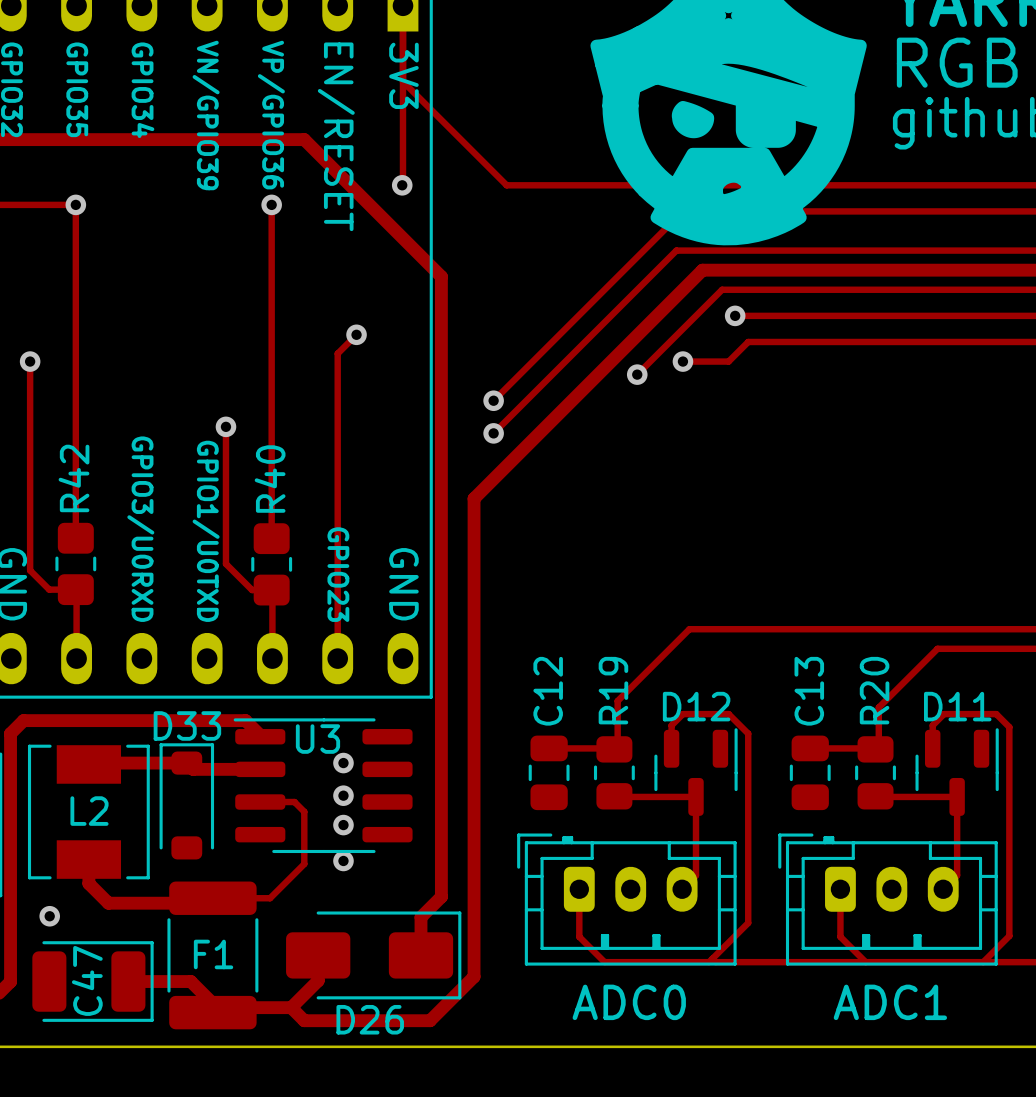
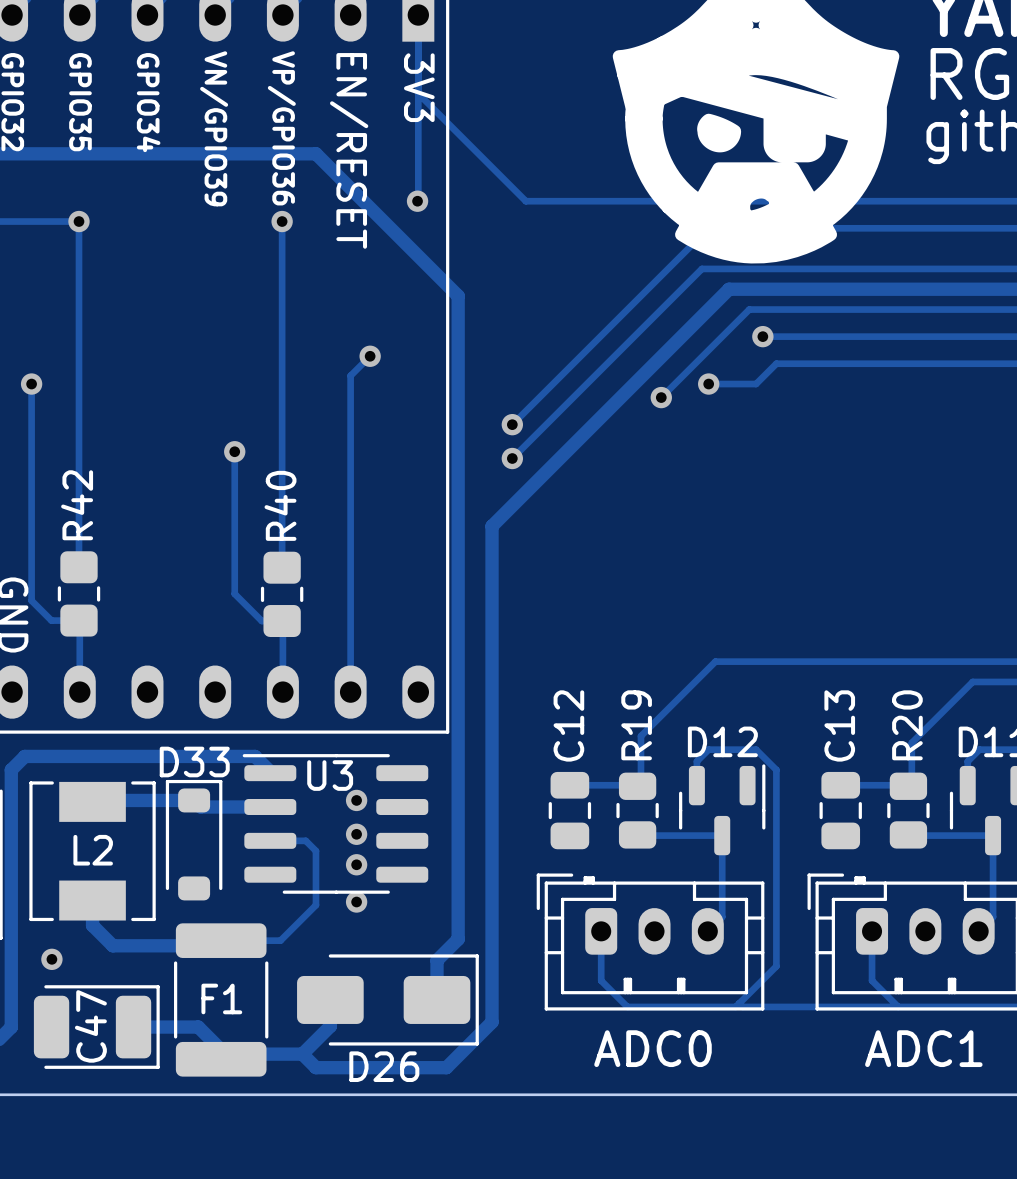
part text: GPIO3/U0RXD (140, 529) -> none
part text: GPIO1/U0TXD (206, 531) -> none
part text: GPIO23 (338, 574) -> none
part text: GND (403, 584) -> none

